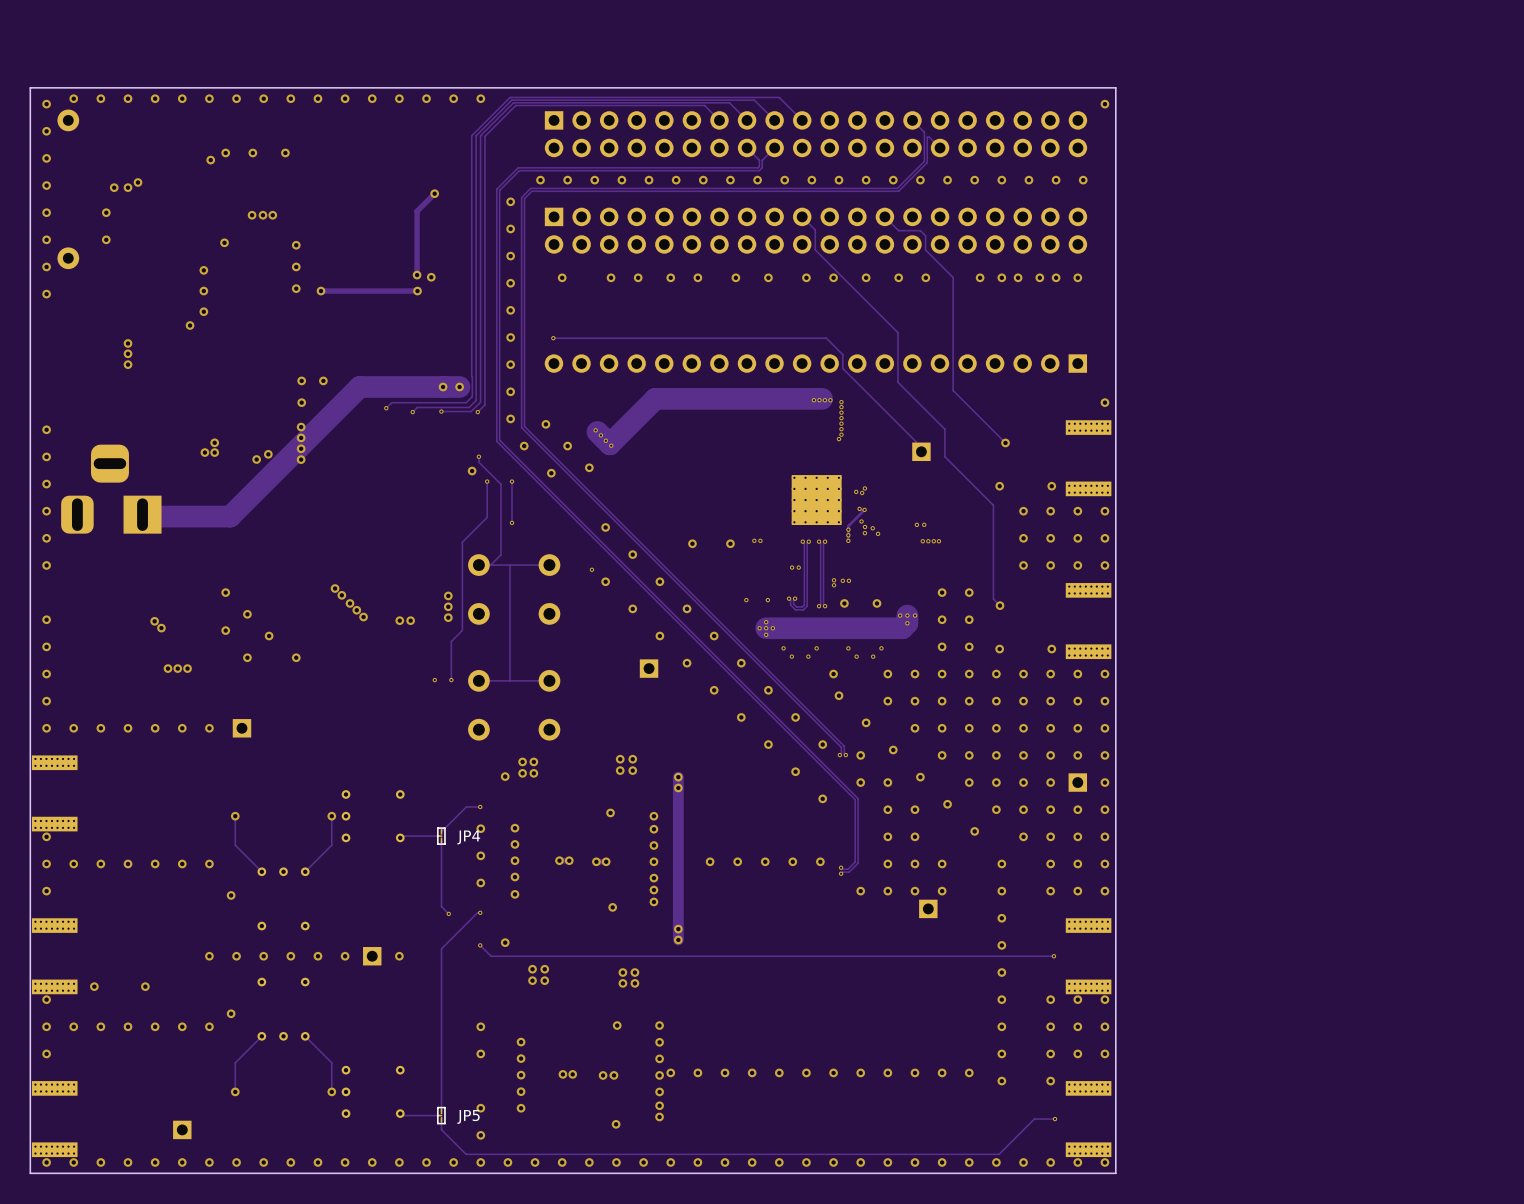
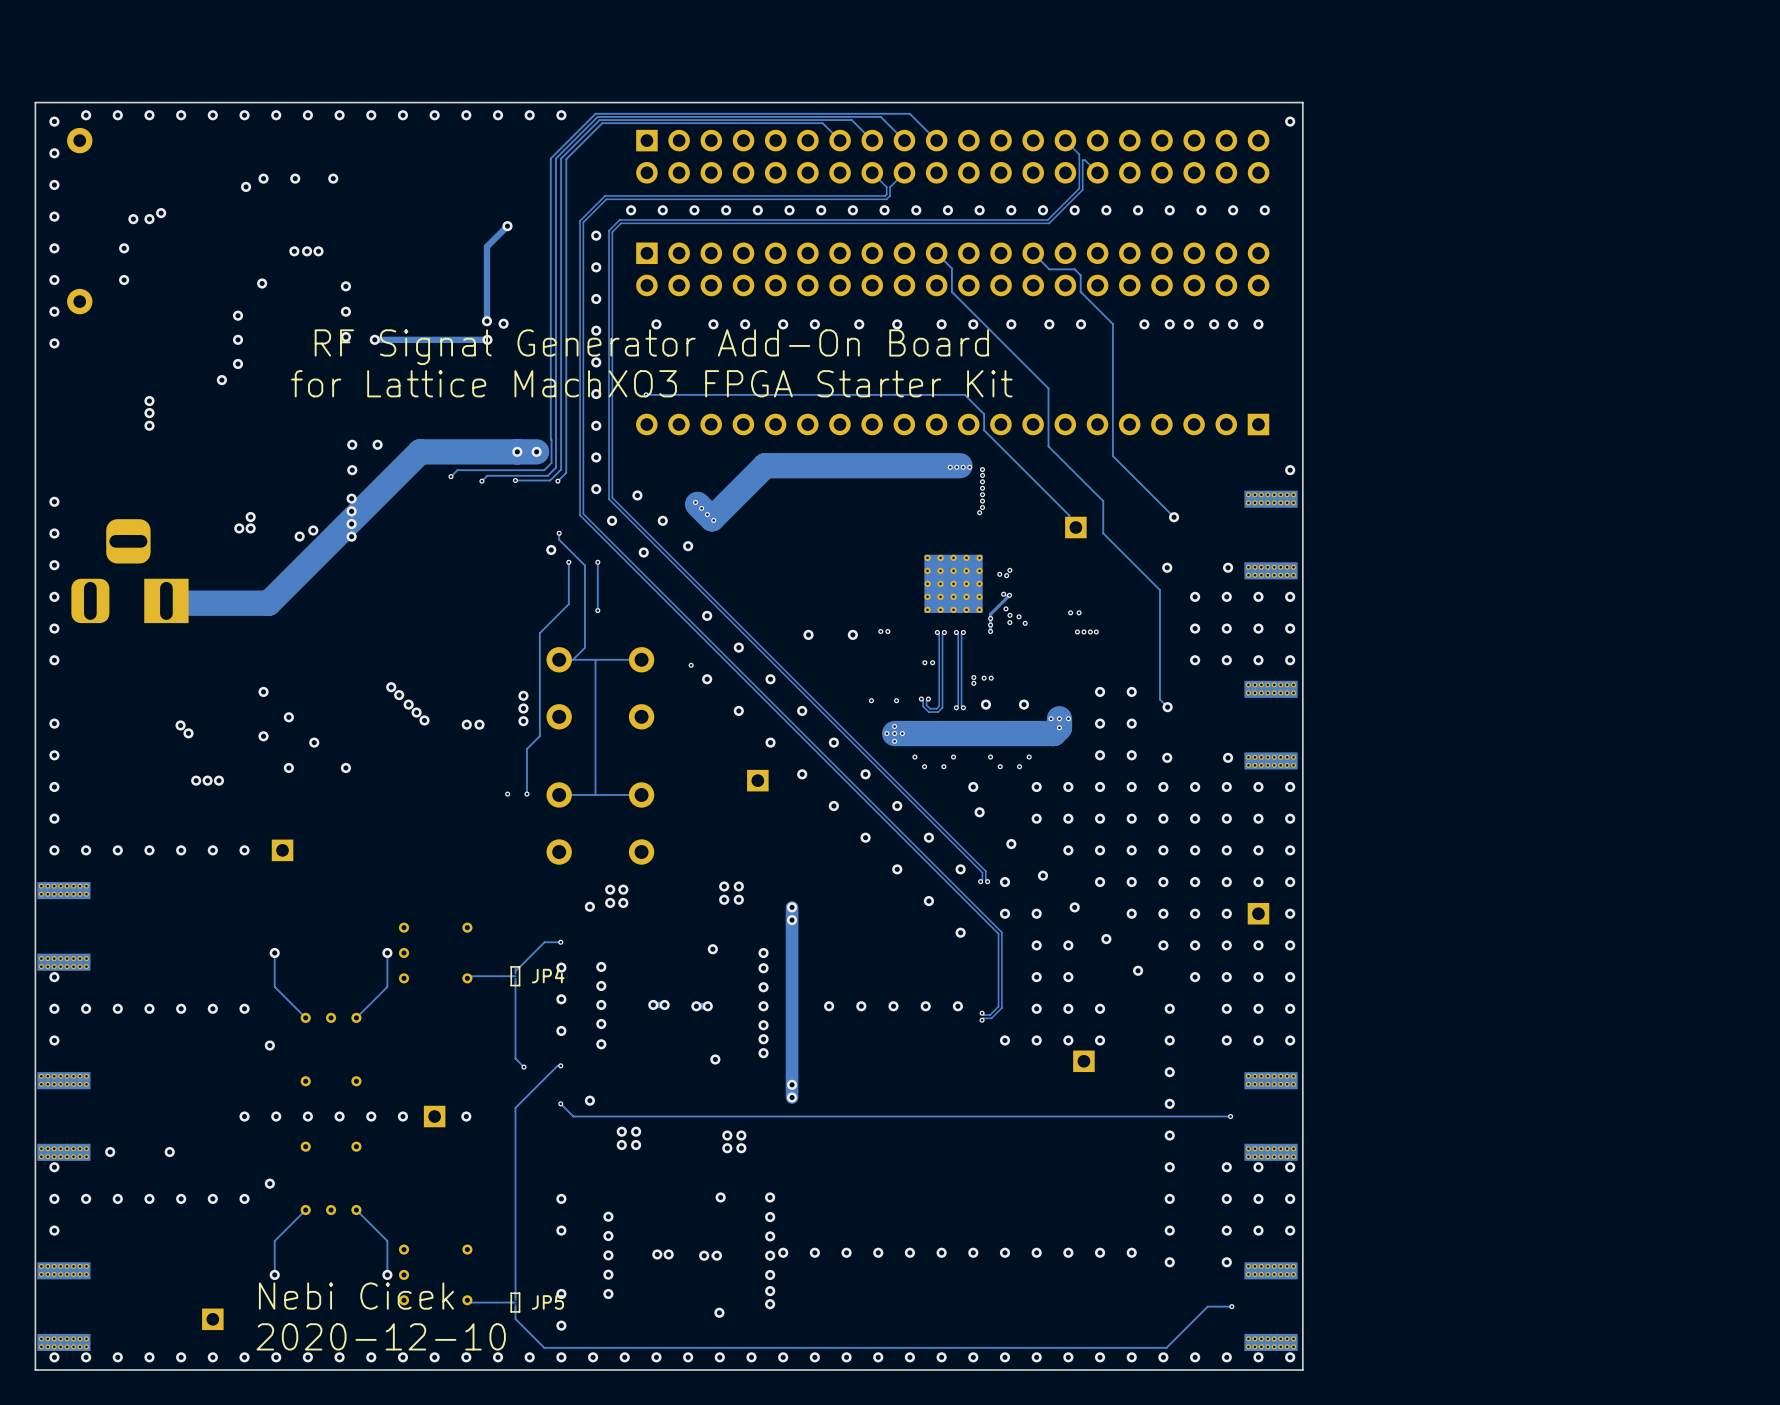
text: none -> RF Signal Generator Add-On Board (651, 347)
text: none -> for Lattice MachXO3 FPGA Starter Kit (651, 383)
text: none -> Nebi Cicek (356, 1296)
text: none -> 2020-12-10 (381, 1336)

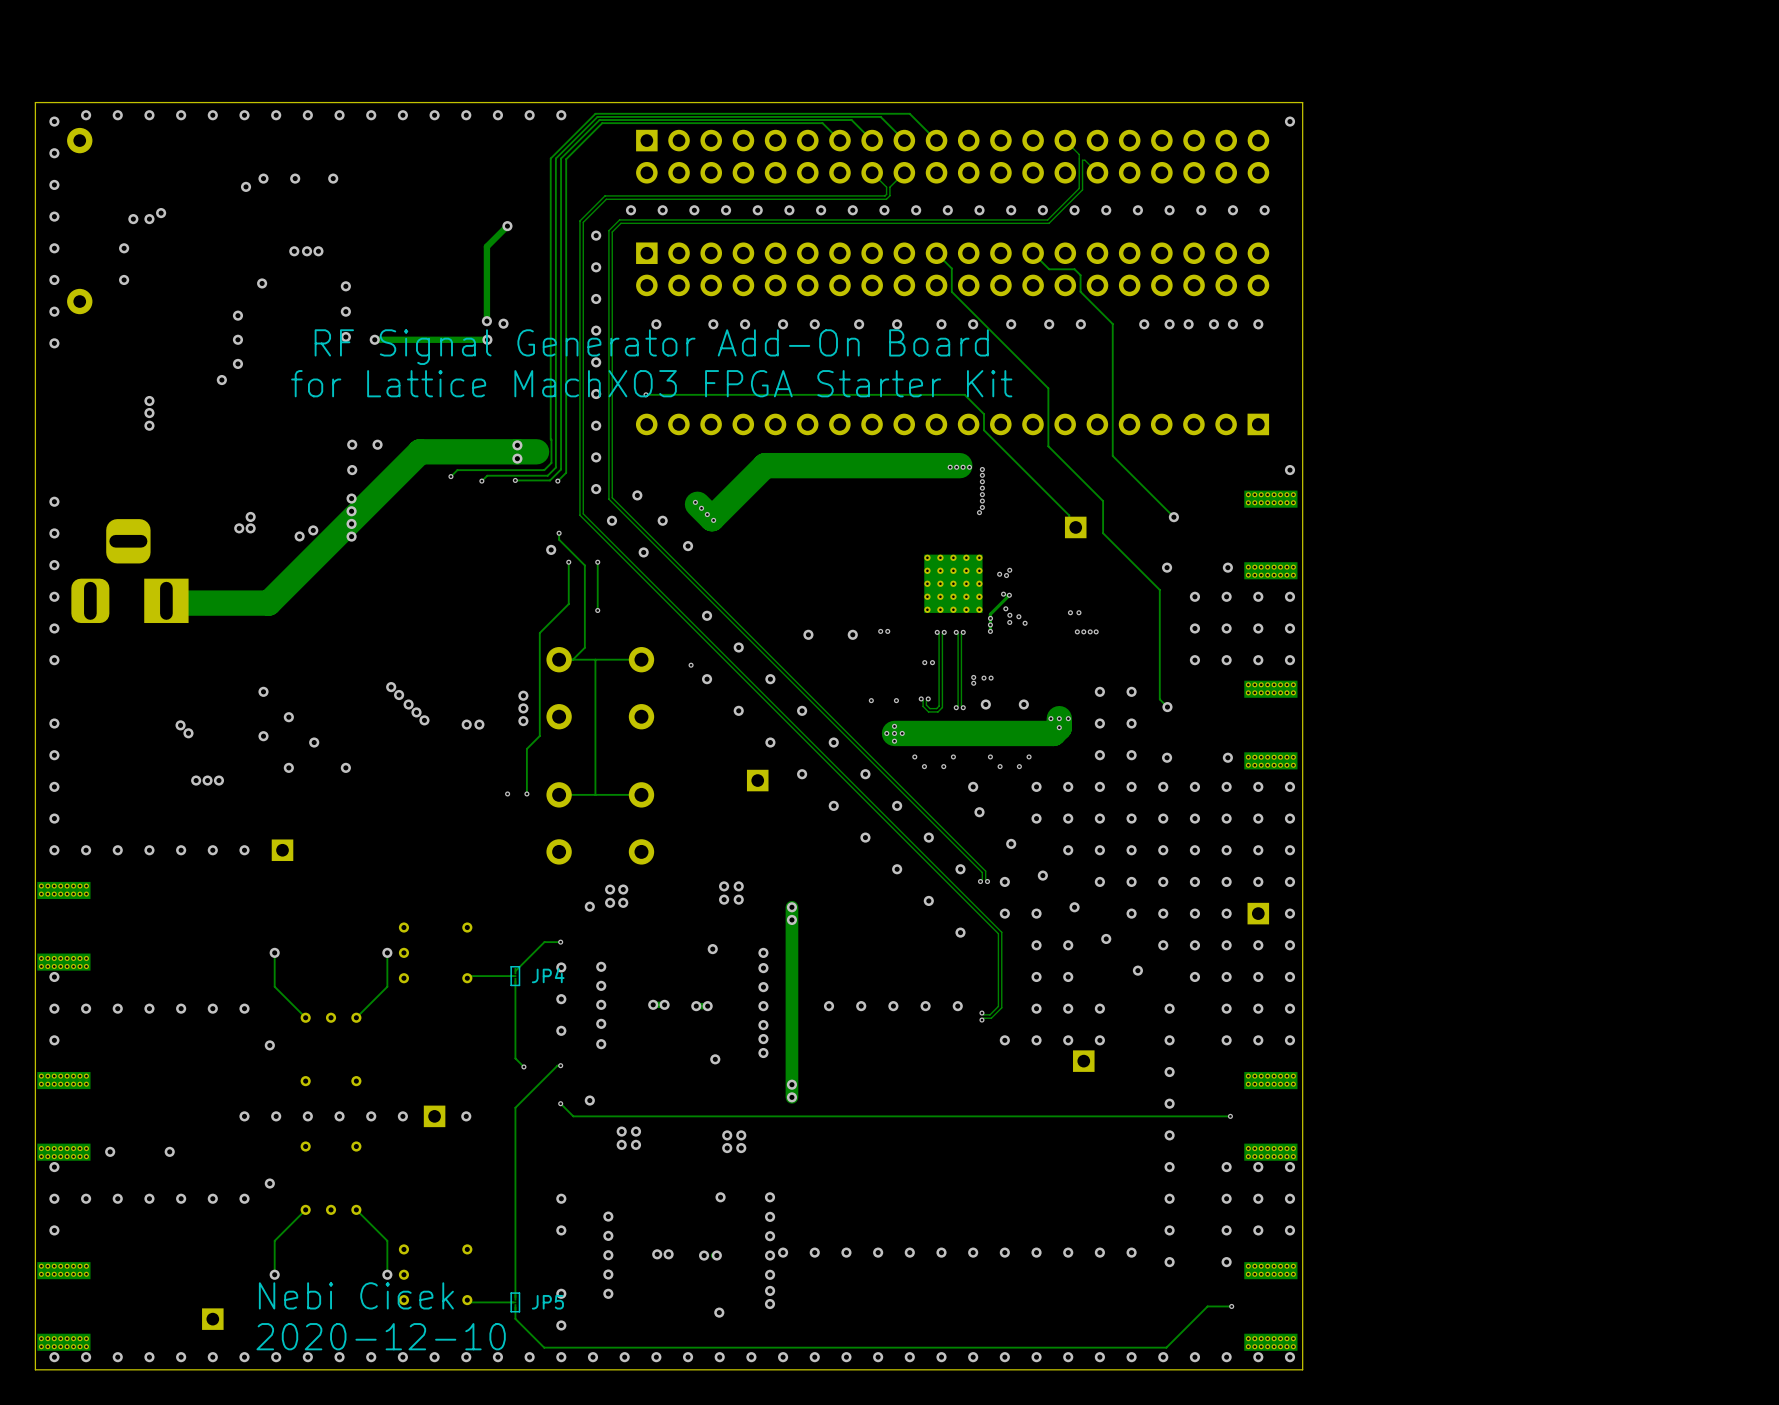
via: none -> (517, 445)
via: (517, 451) -> none
via: (536, 451) -> none
via: none -> (517, 458)

